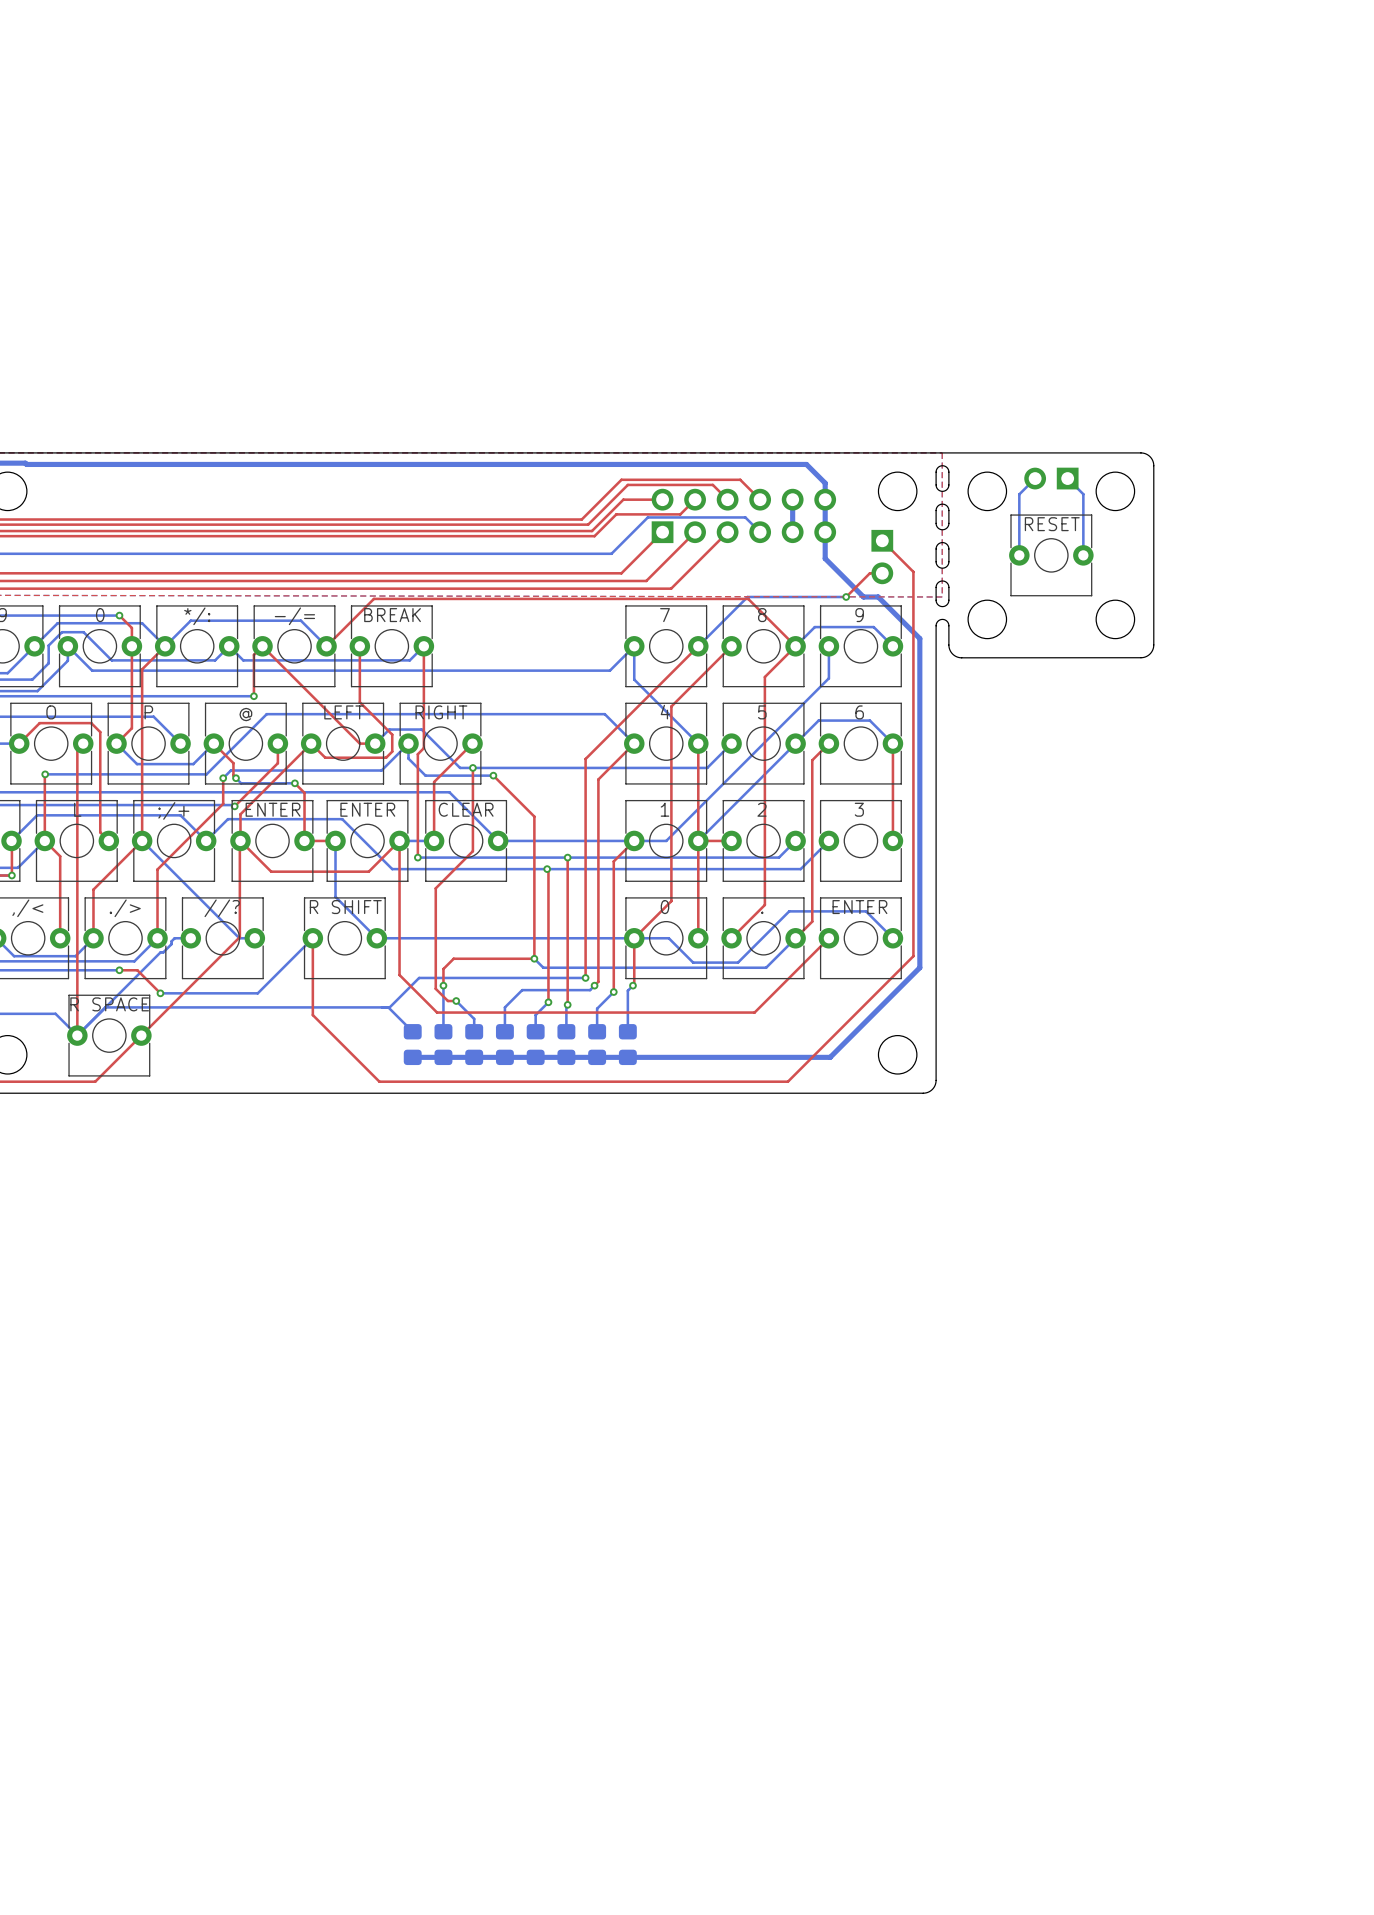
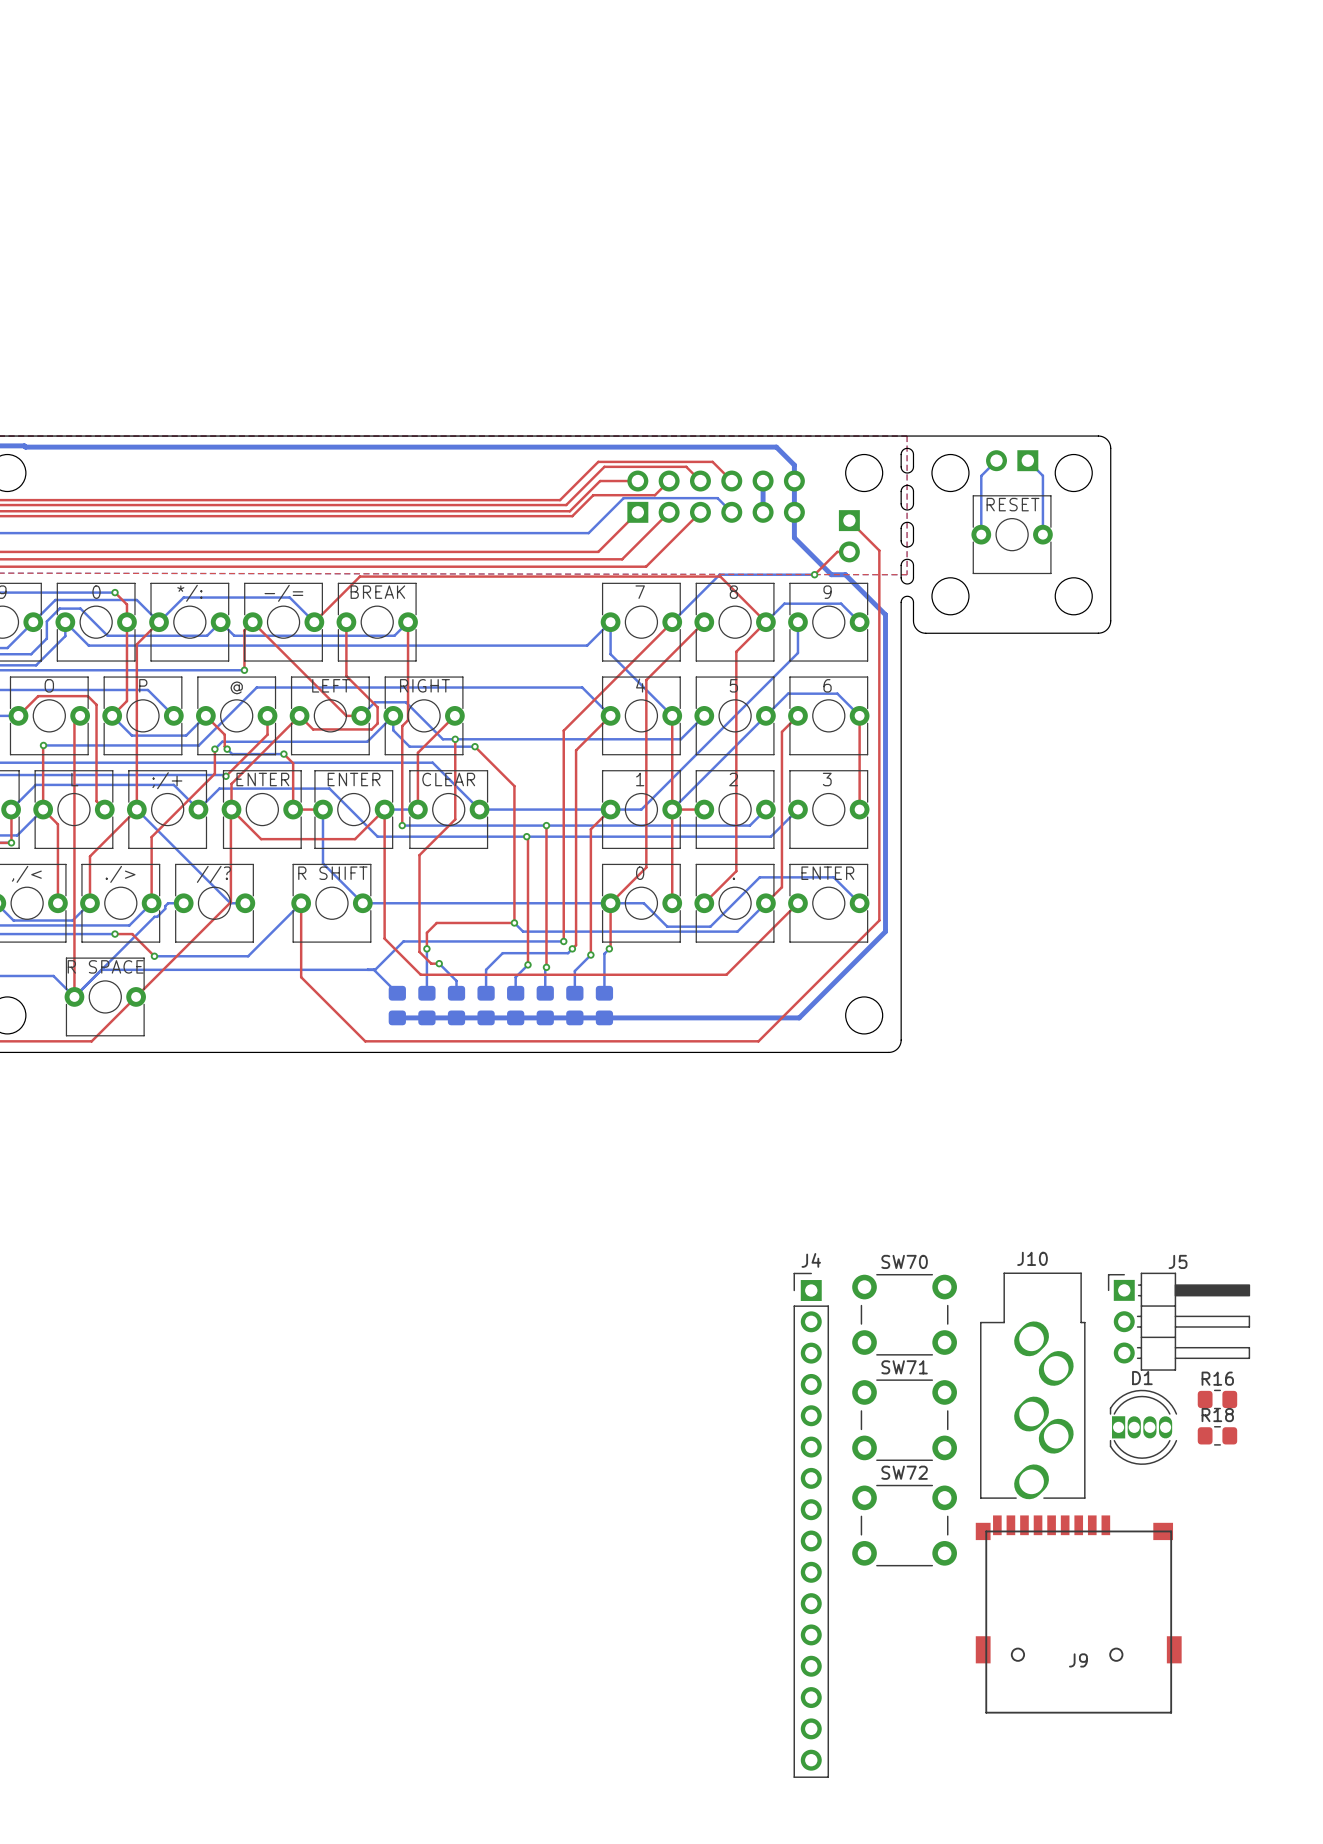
SW70: none -> (904, 1314)
J5: none -> (1179, 1321)
J10: none -> (1032, 1385)
R16: none -> (1217, 1399)
SW71: none -> (904, 1420)
D1: none -> (1143, 1427)
R18: none -> (1217, 1435)
J4: none -> (811, 1525)
SW72: none -> (904, 1525)
J9: none -> (1078, 1614)

